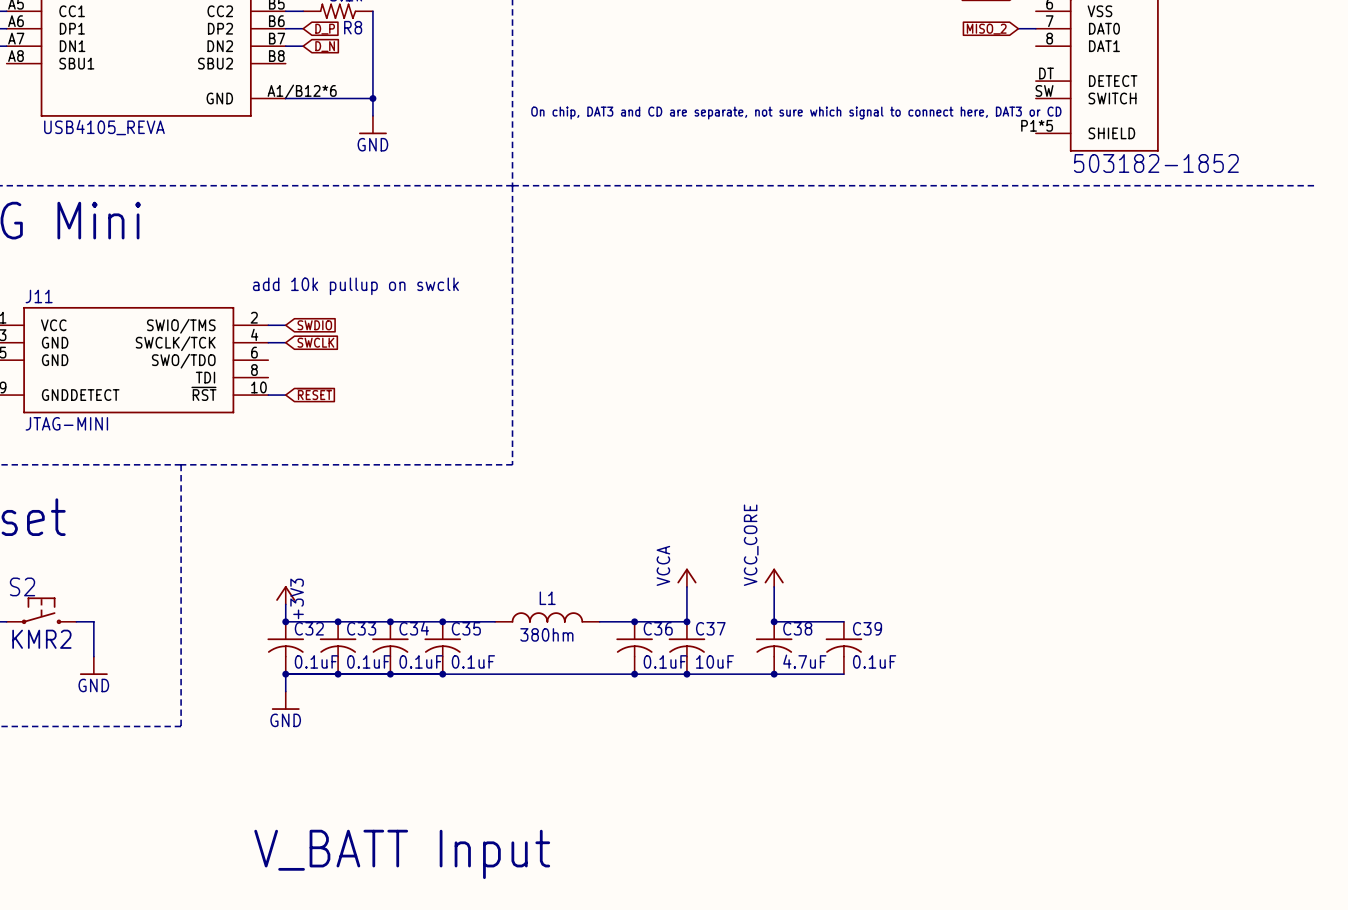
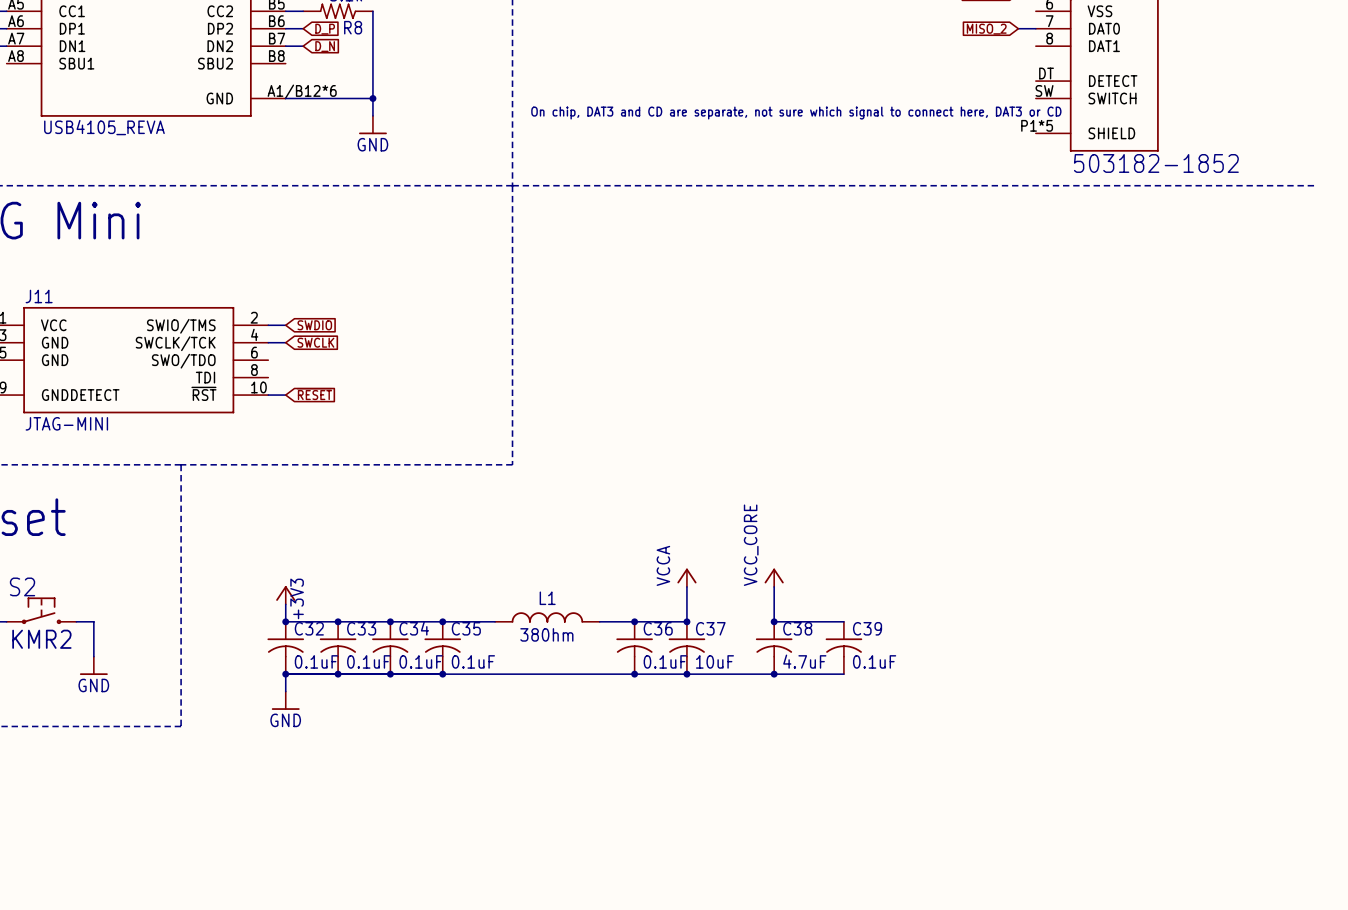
text: add 10k pullup on swclk (355, 286) -> none
text: V_BATT Input (402, 854) -> none

